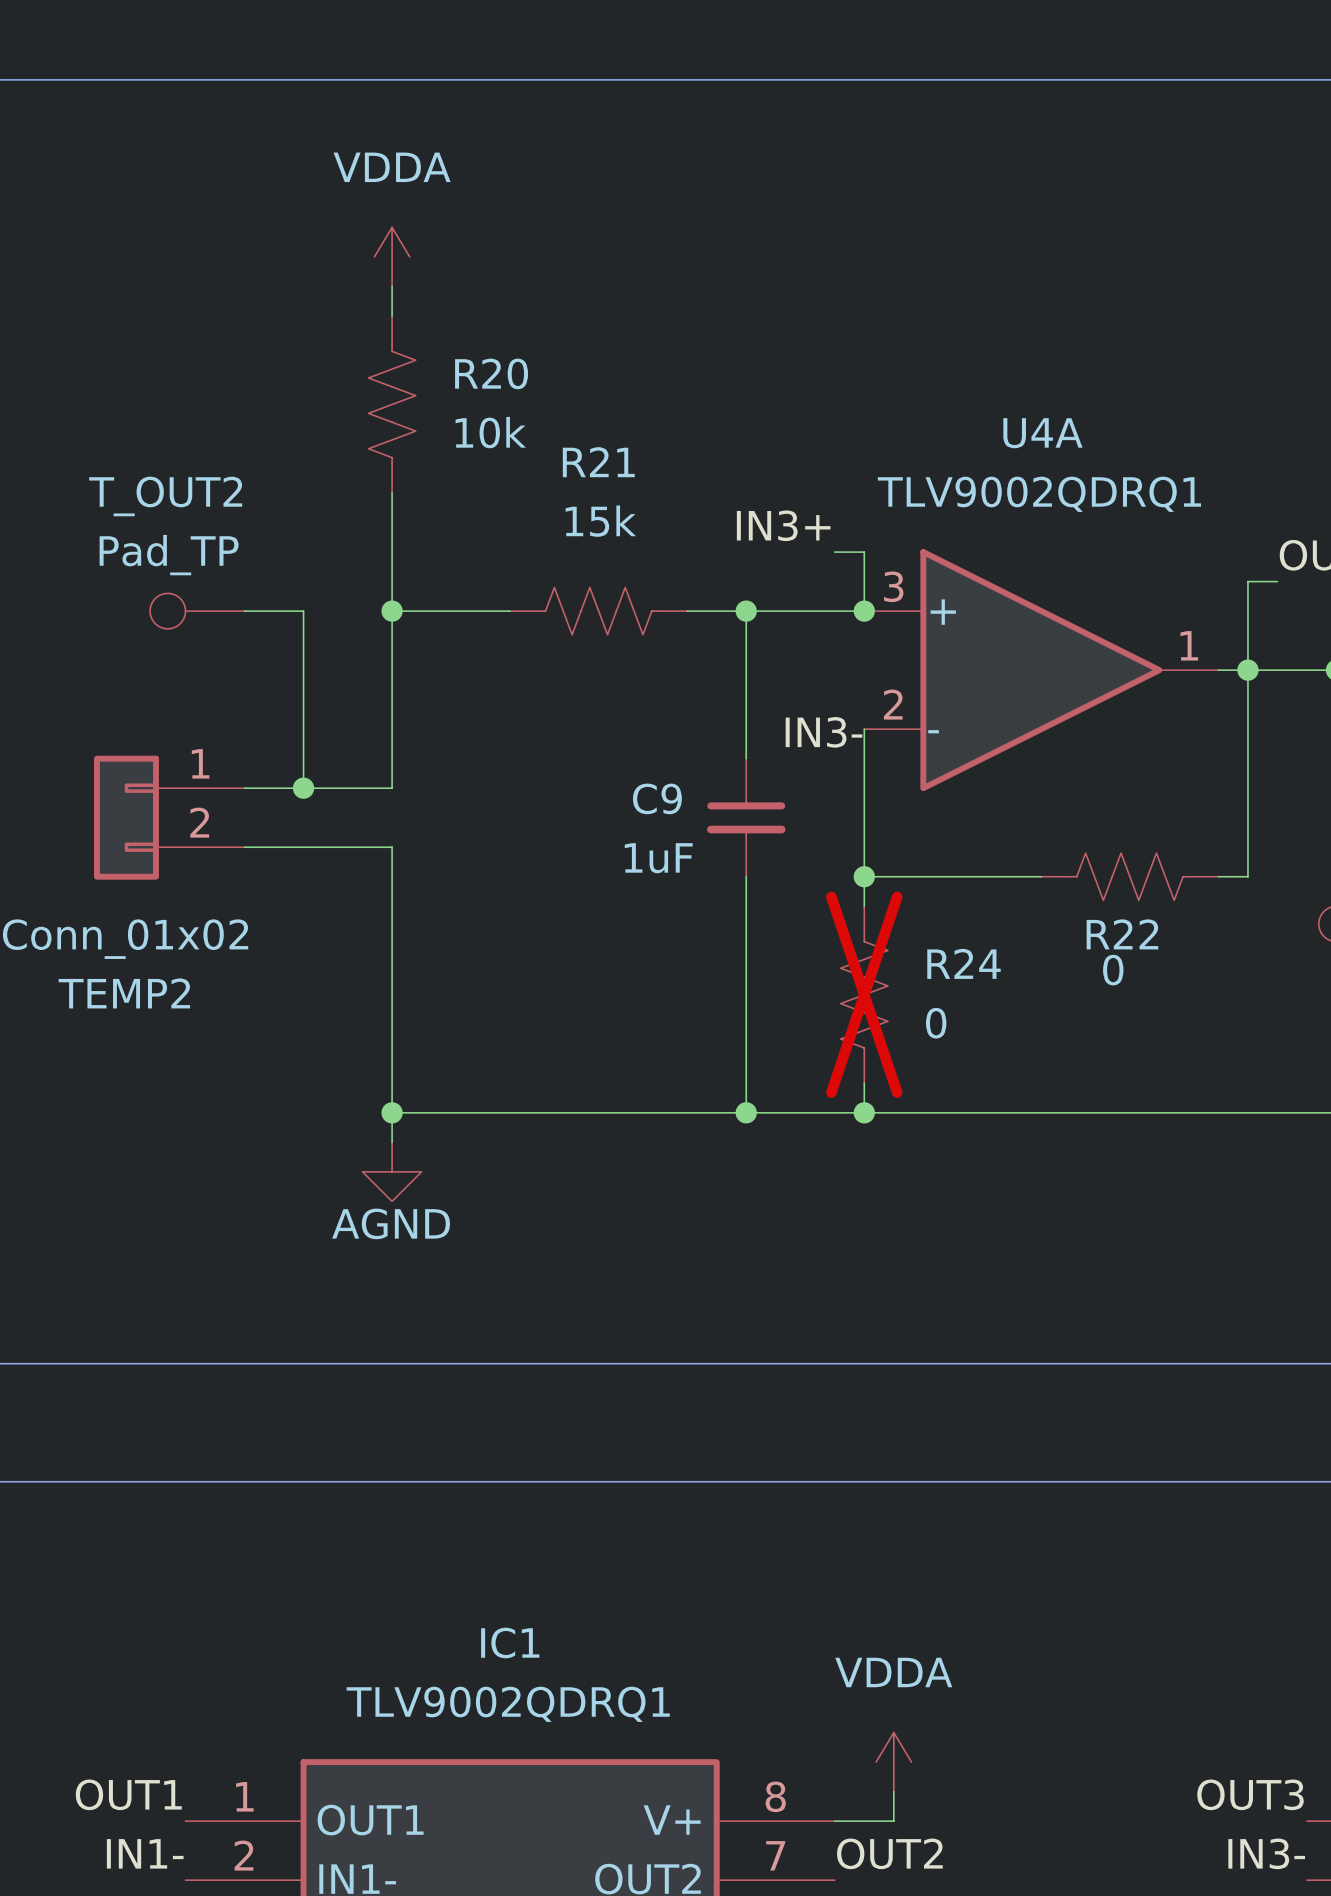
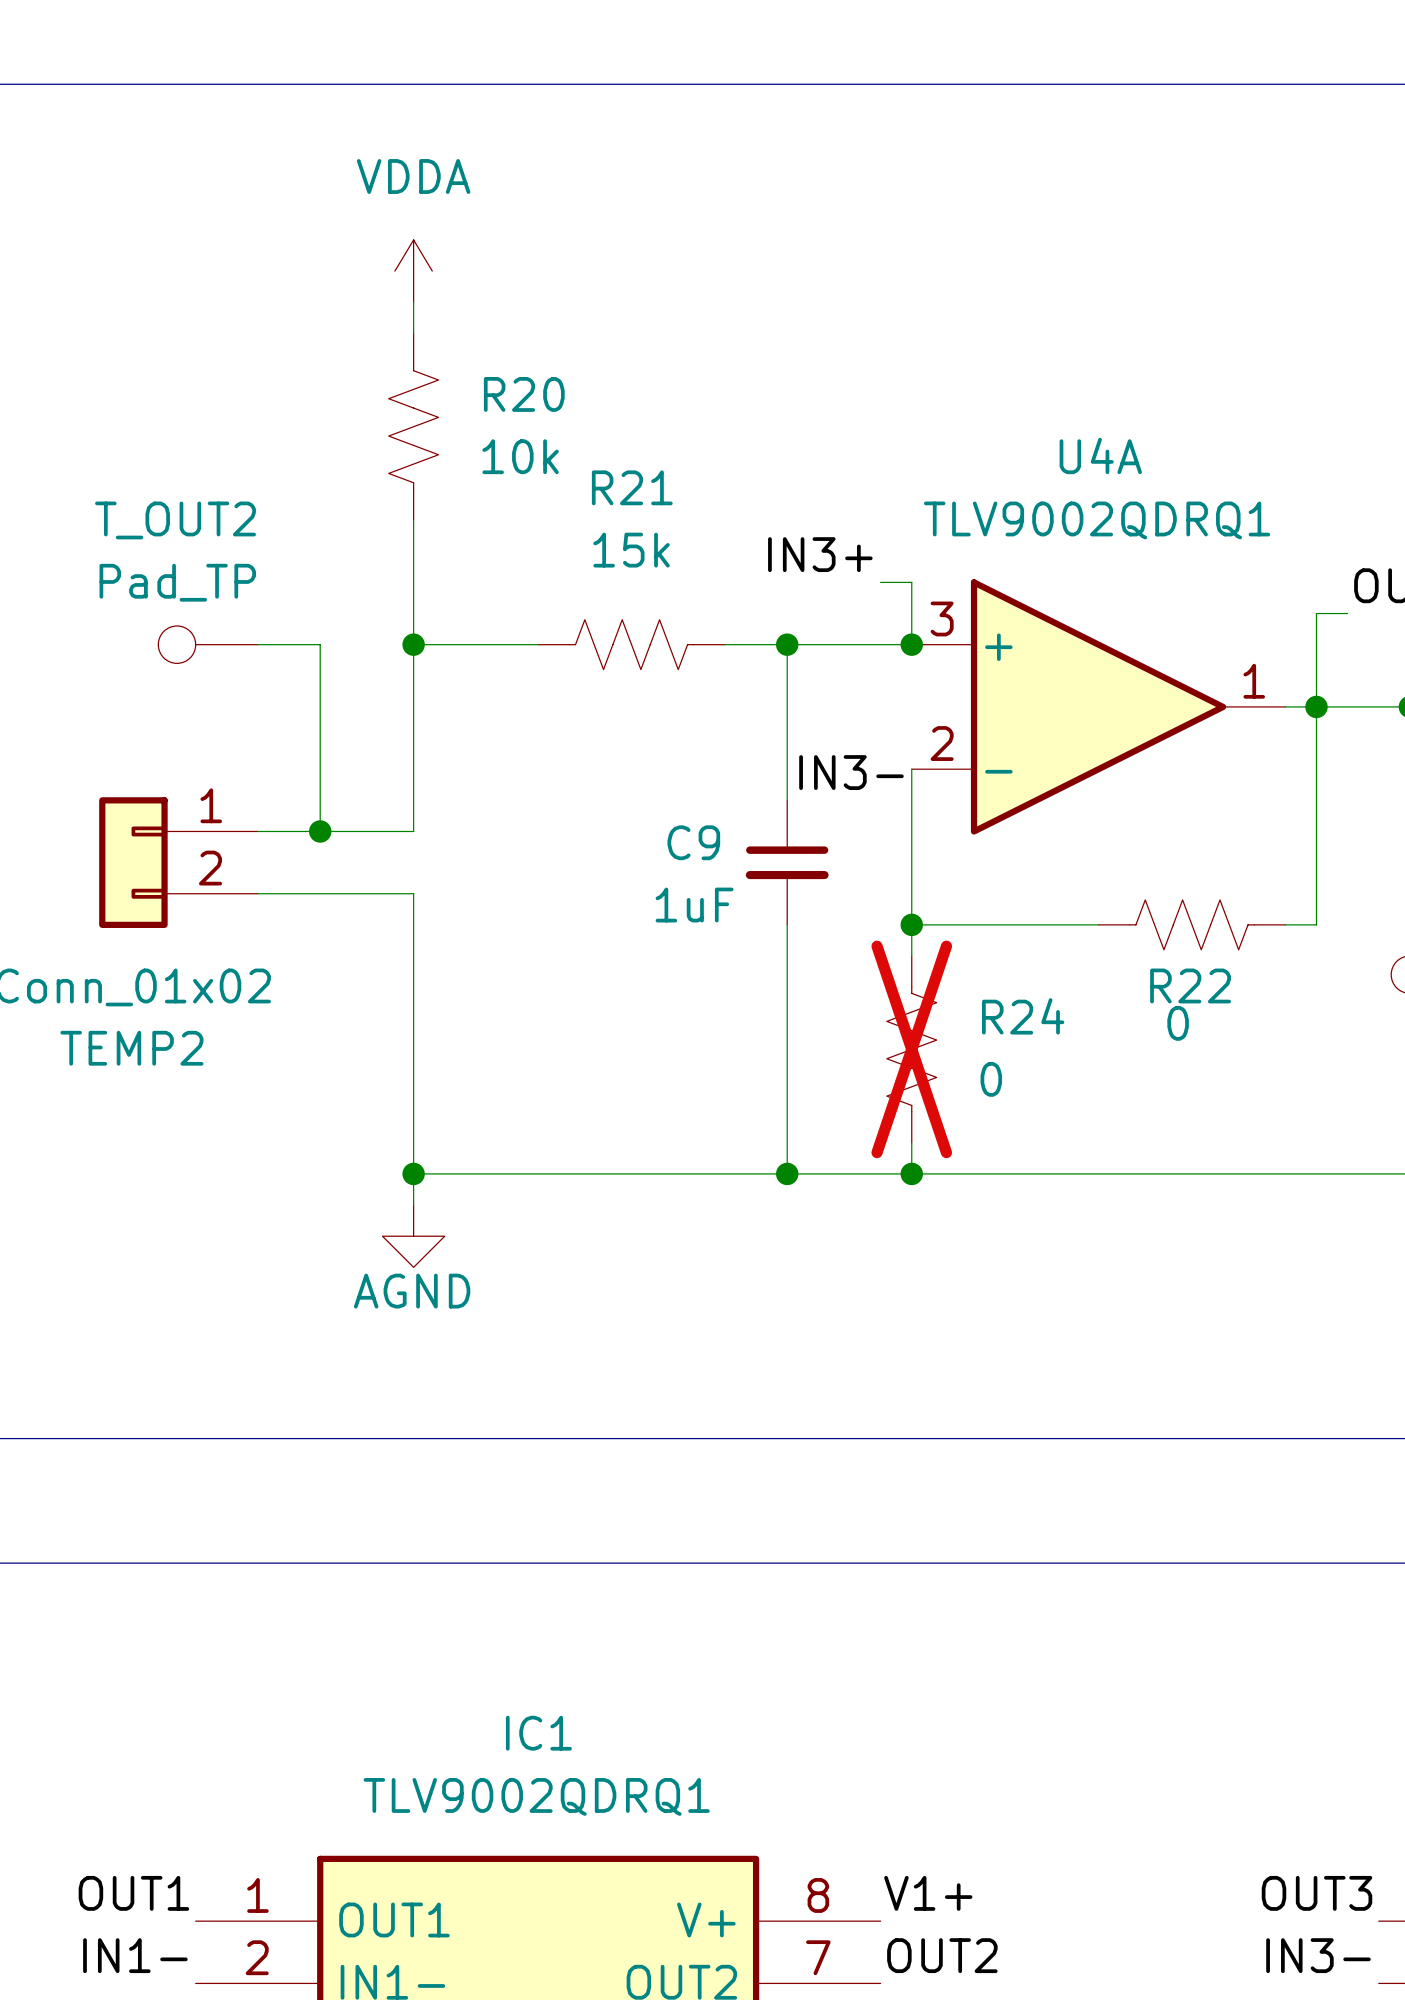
power symbol: VDDA (893, 1762) -> none
wire: (893, 1791) (893, 1821) (834, 1821) -> none
label: none -> V1+ (928, 1893)

